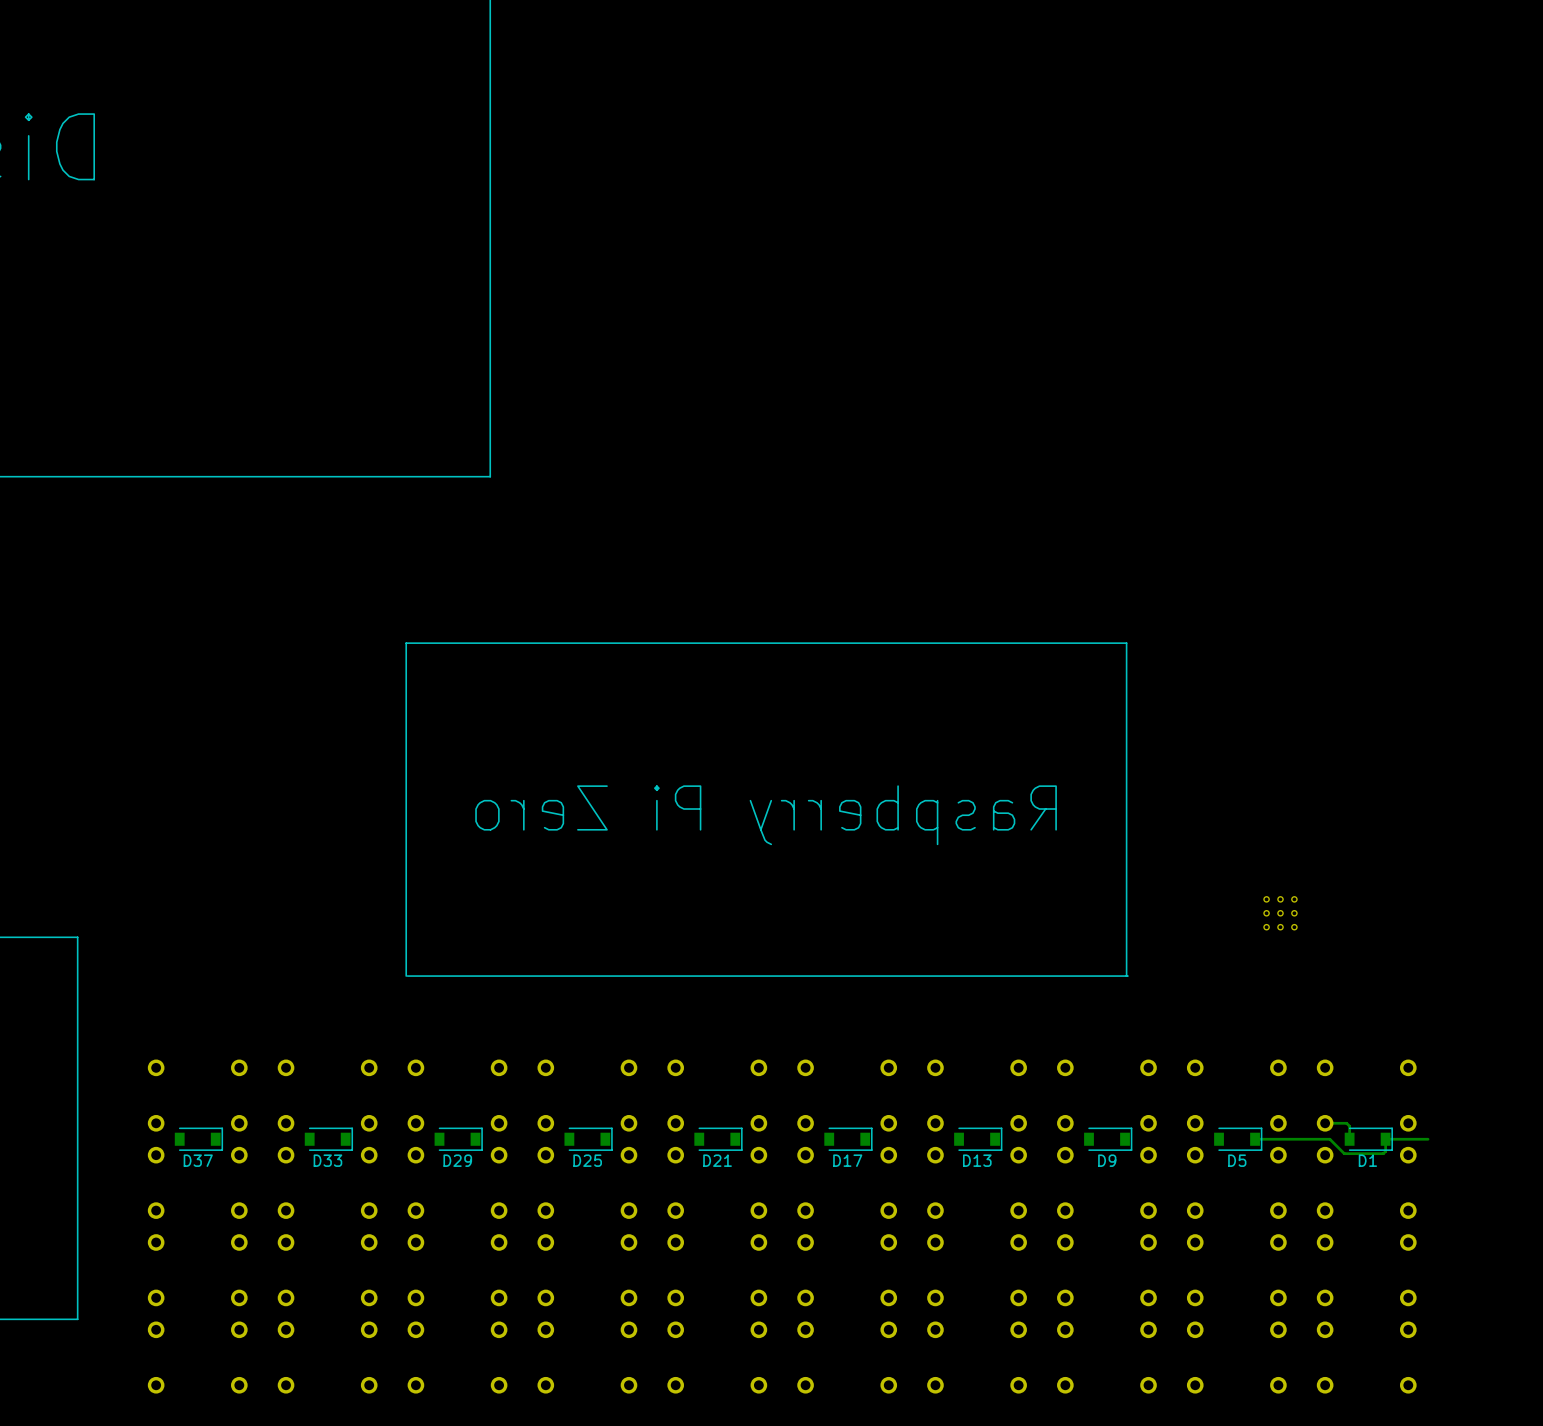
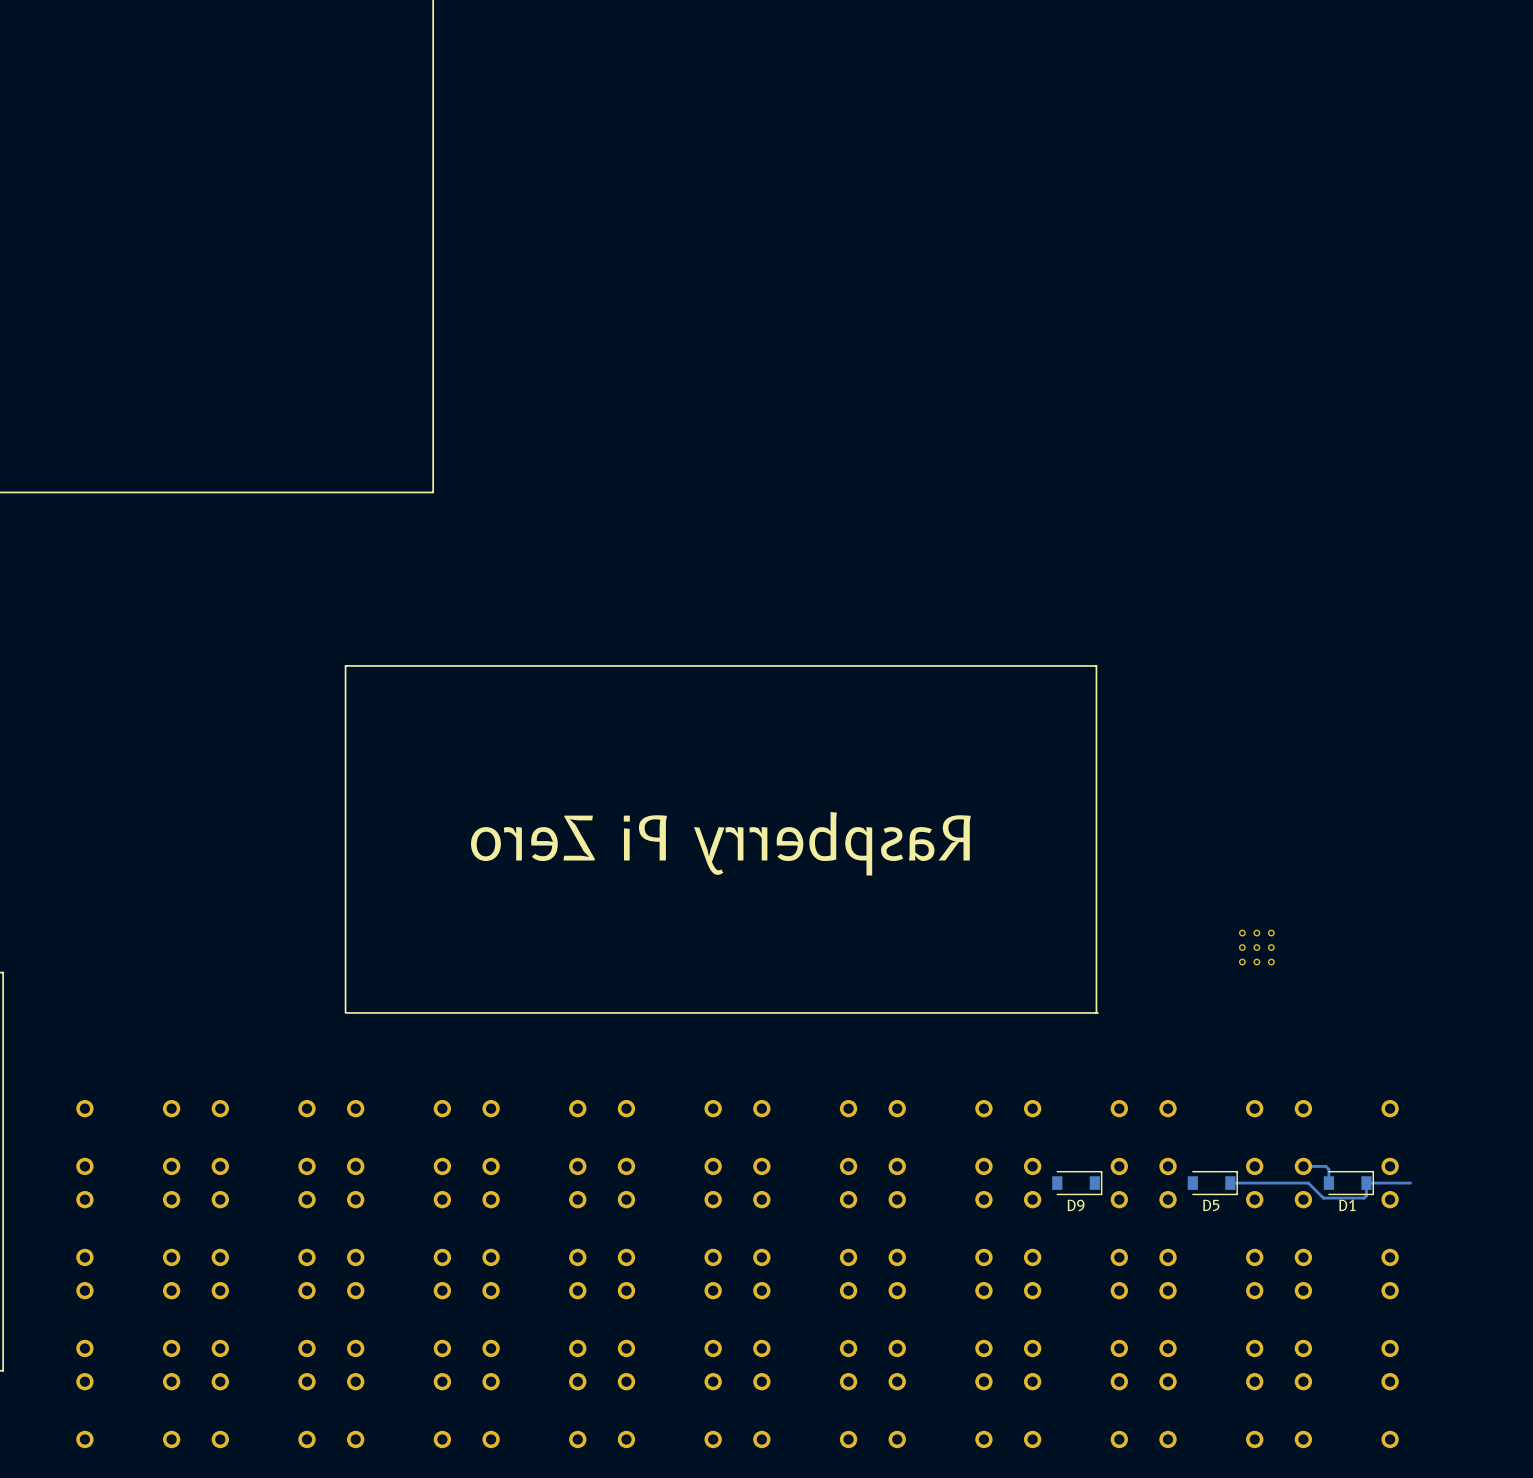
D37: (198, 1139) -> none
D33: (328, 1139) -> none
D29: (458, 1139) -> none
D25: (588, 1139) -> none
D21: (718, 1139) -> none
D17: (848, 1139) -> none
D13: (978, 1139) -> none

